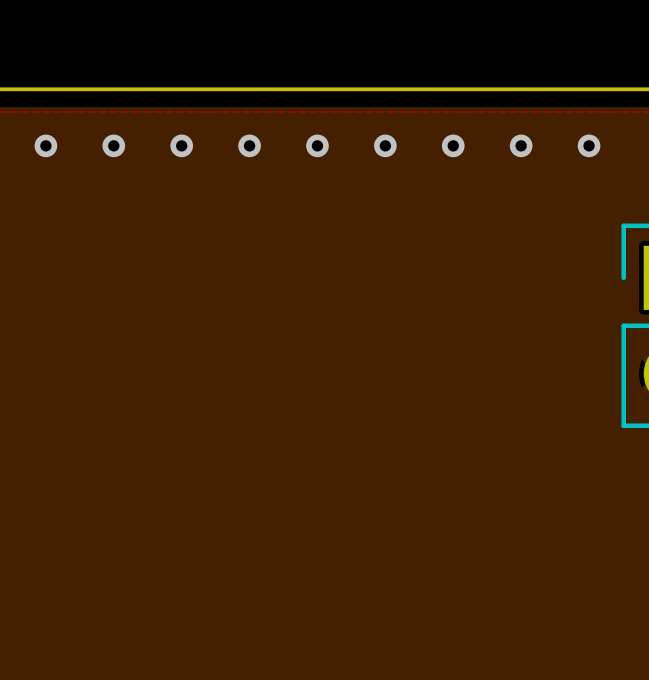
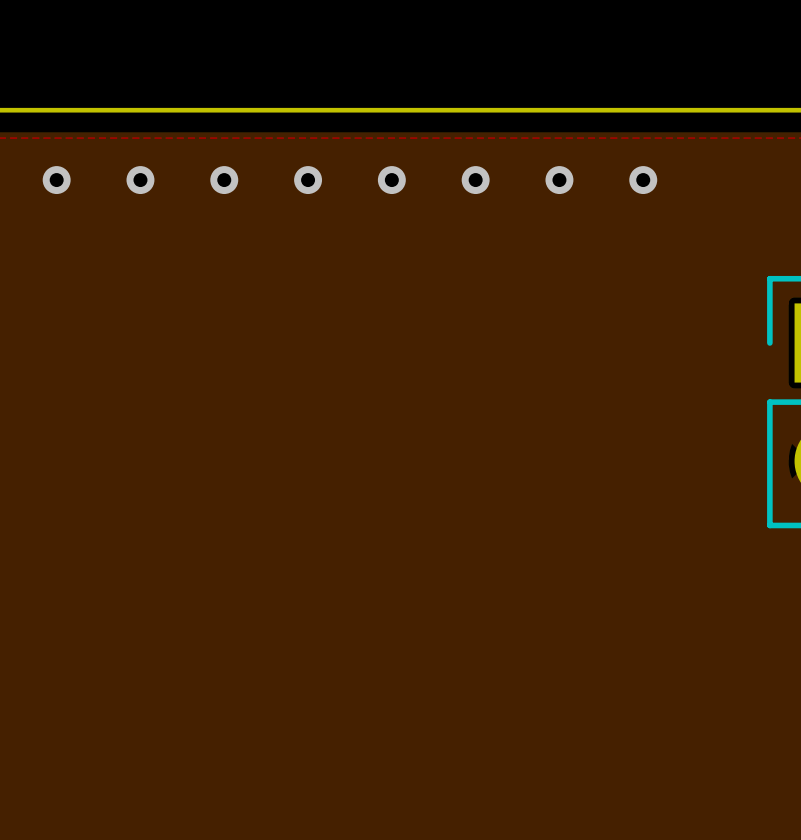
via: (589, 145) -> none

